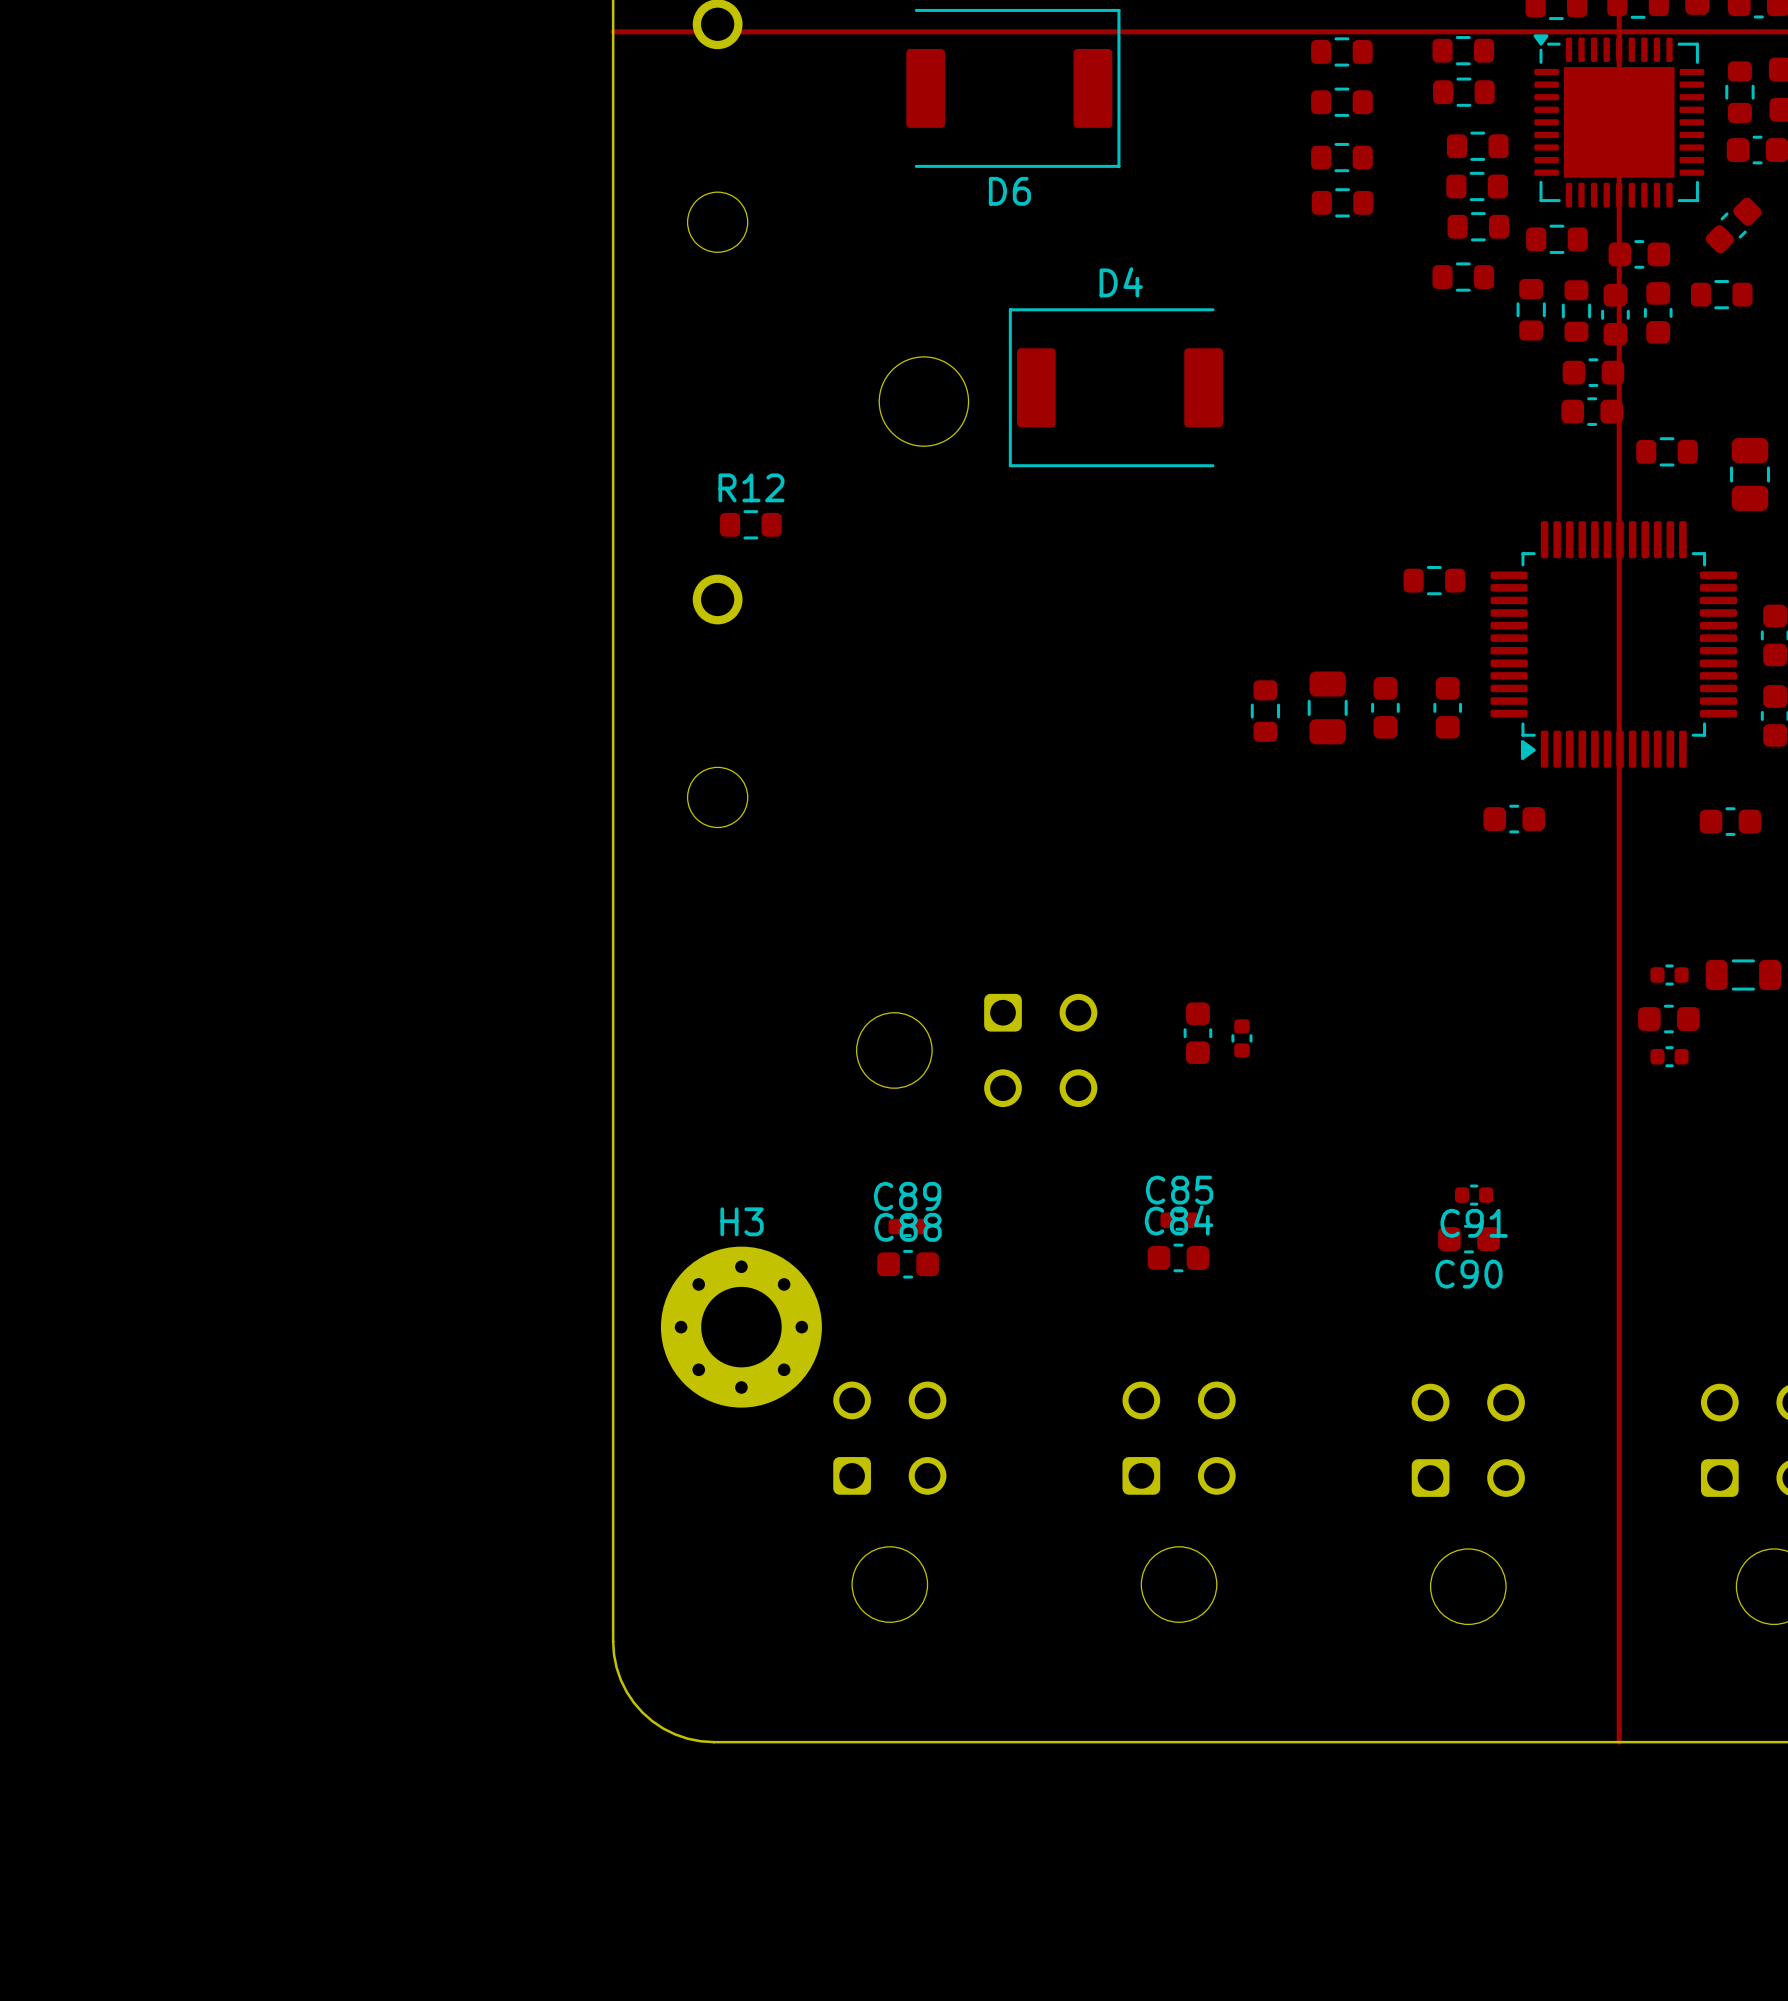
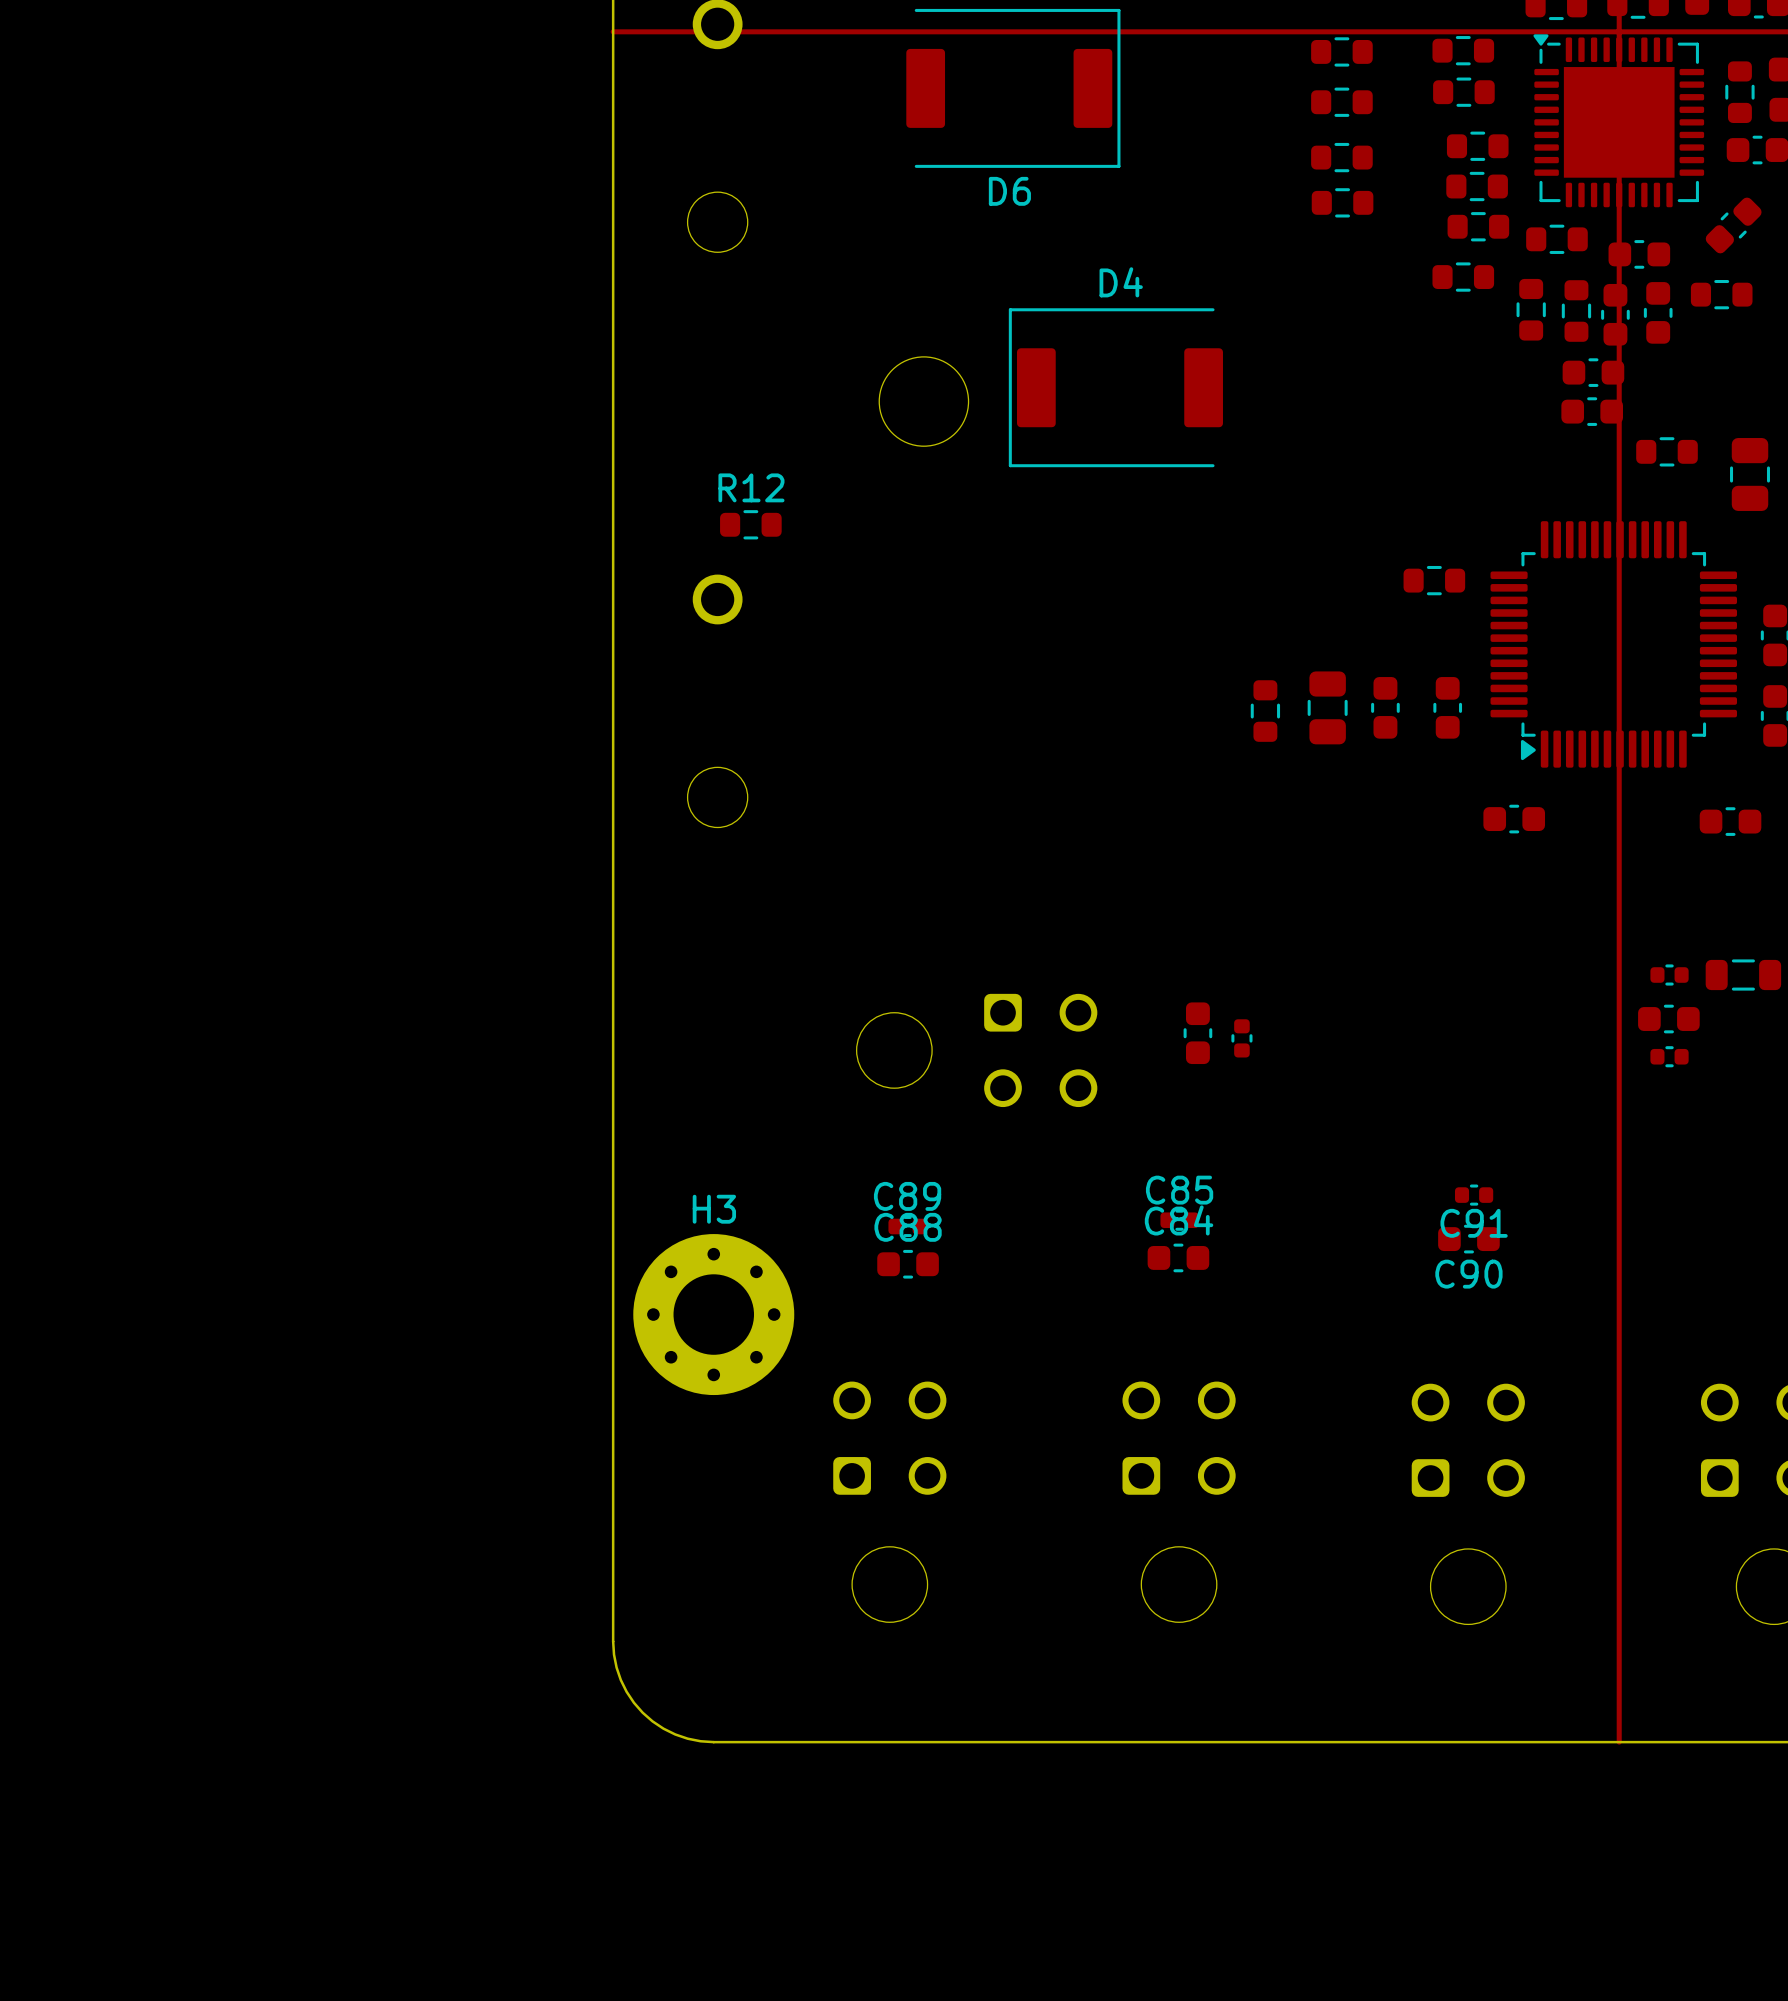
H3 position: (741, 1327) -> (713, 1314)

